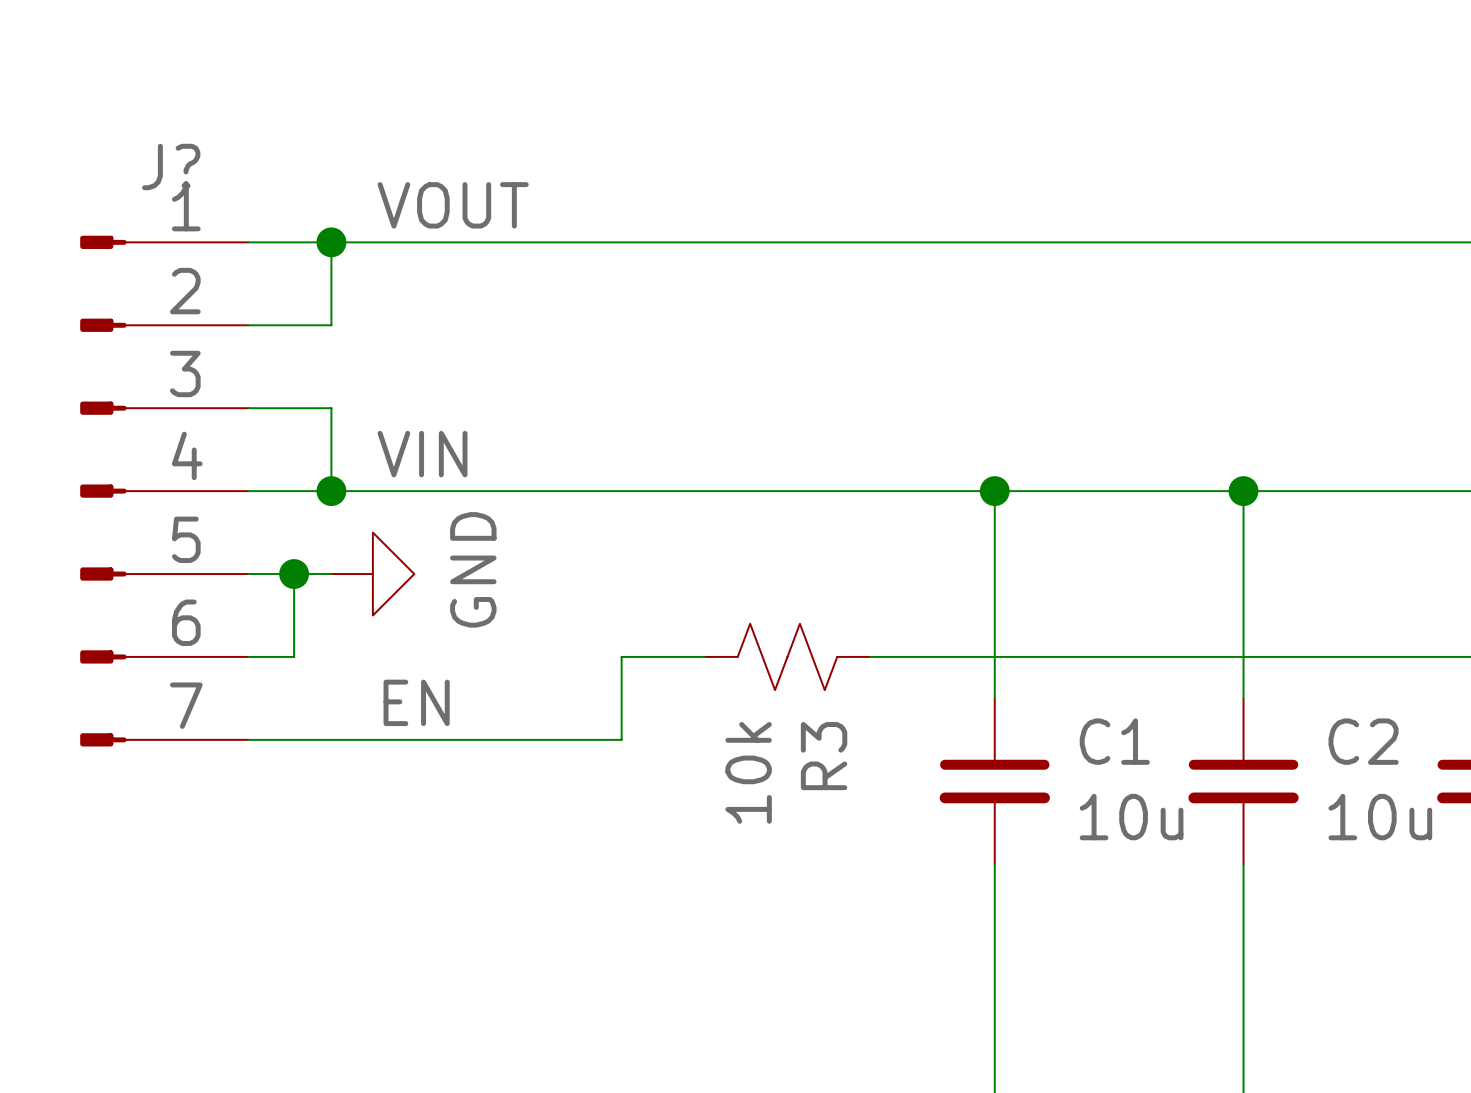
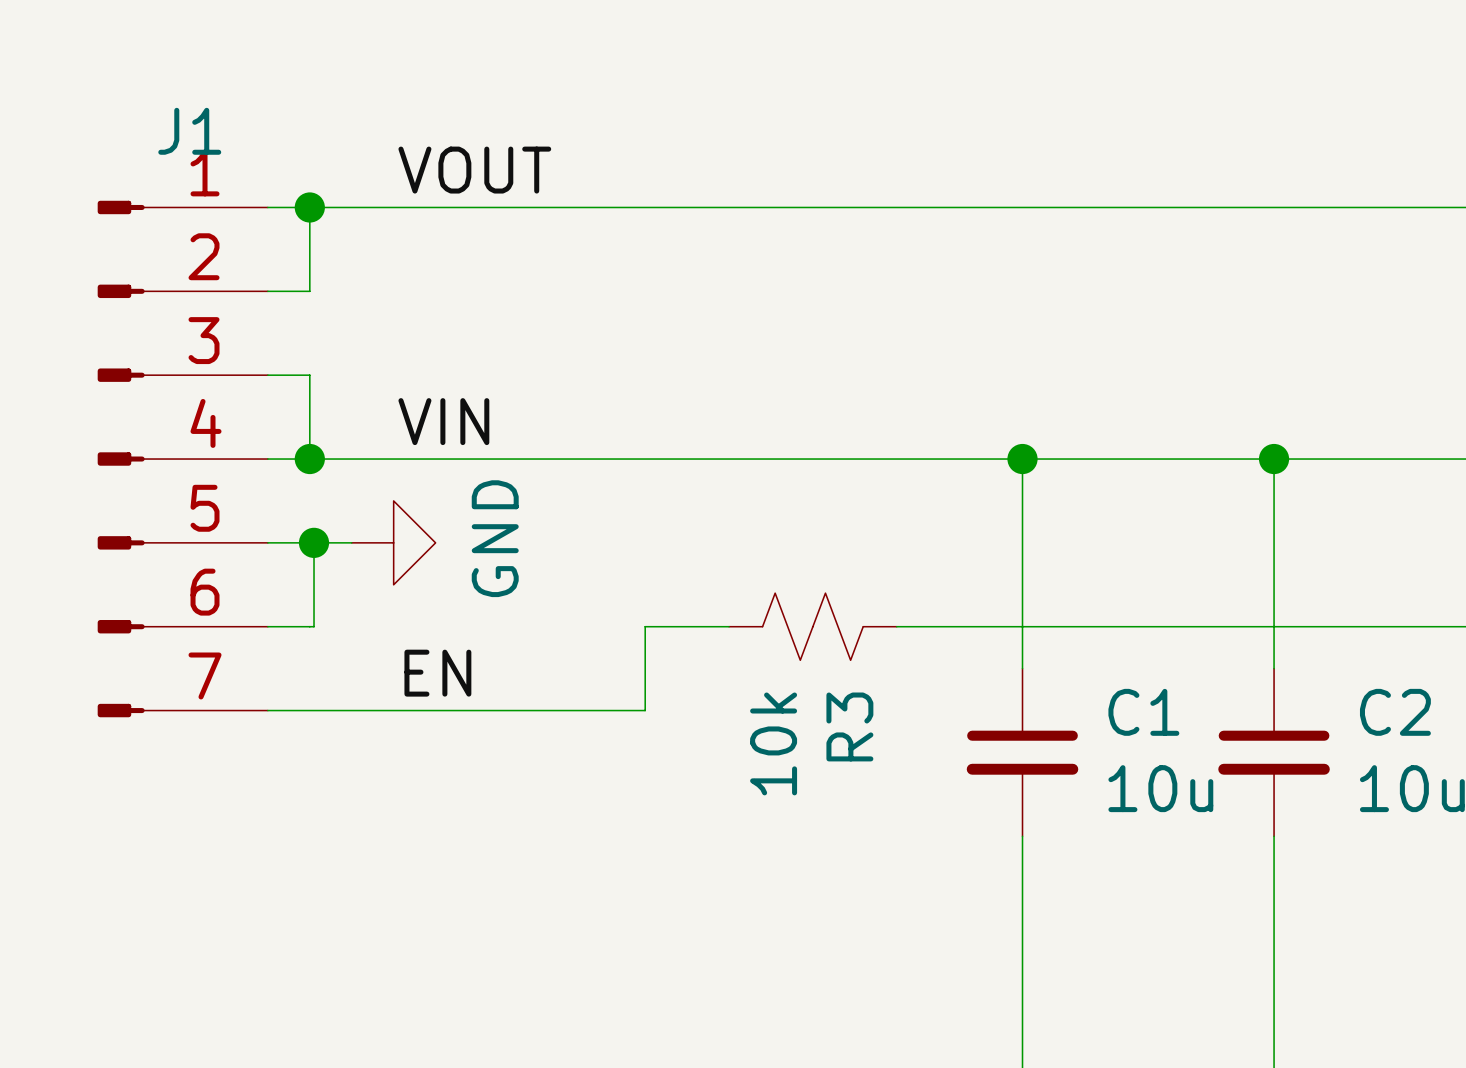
J? name: J? (171, 167) -> J1 (189, 131)
wire: (331, 242) (331, 325) (289, 325) -> (309, 207) (309, 291)
junction position: (331, 242) -> (309, 207)
wire: (289, 408) (331, 408) (331, 491) -> (309, 375) (309, 459)
junction position: (331, 491) -> (309, 459)

